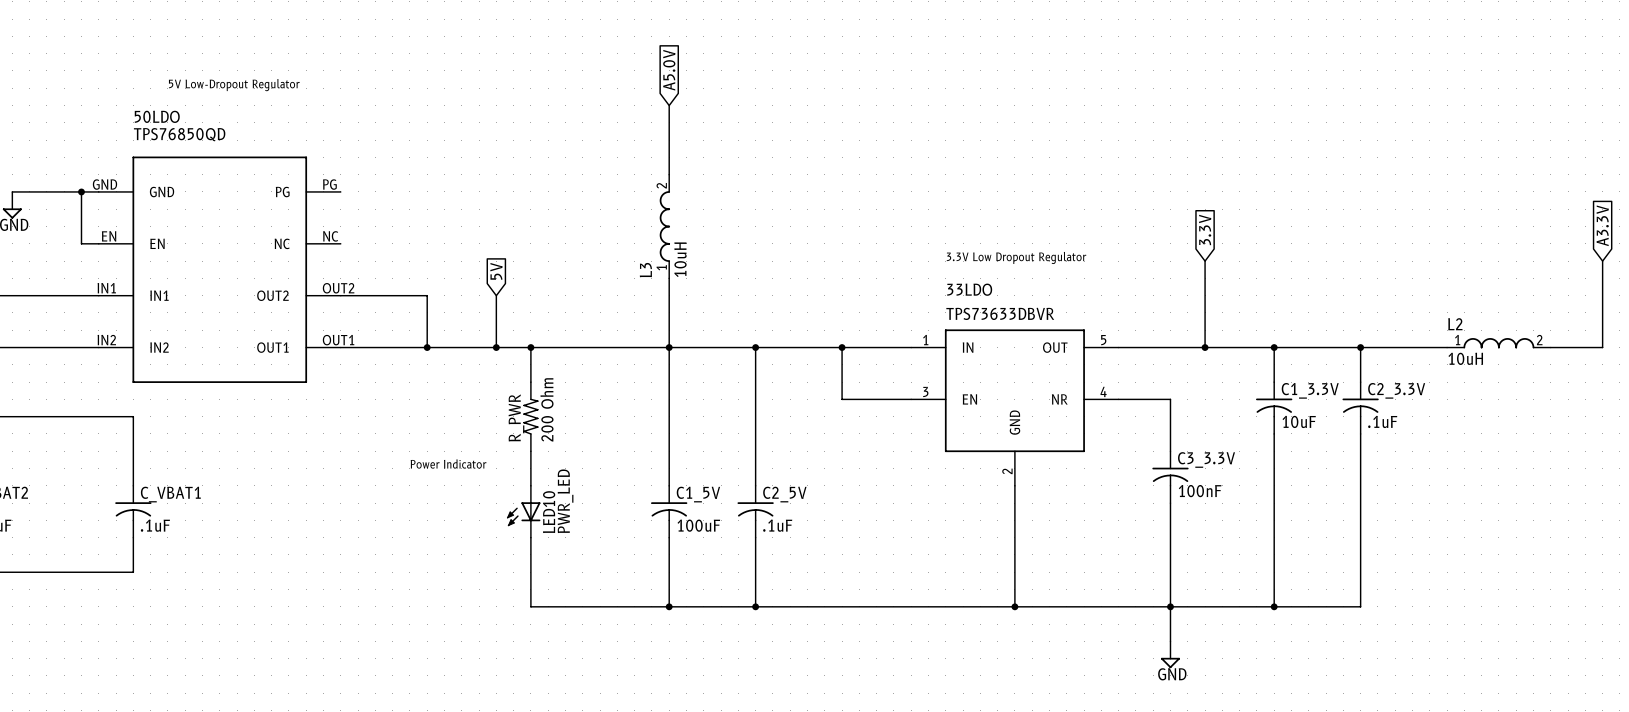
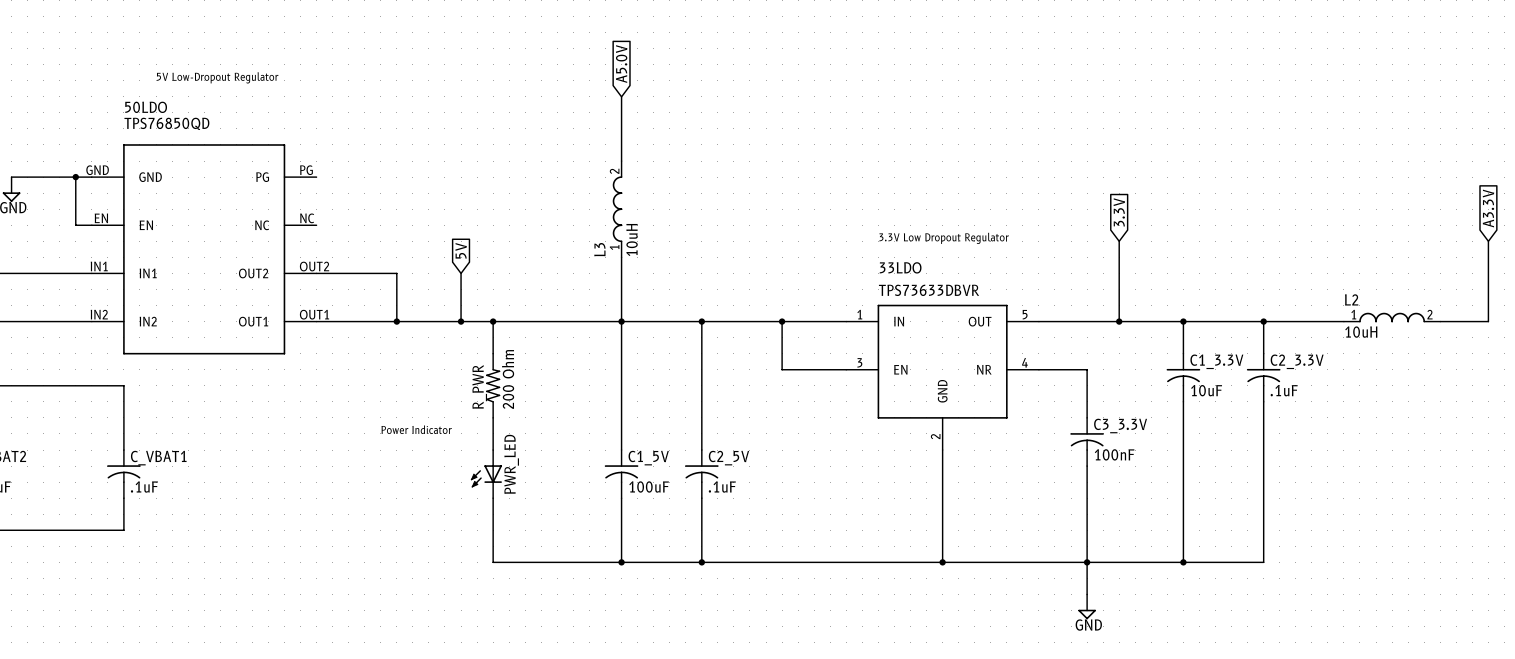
LED10 value: PWR_LED (565, 501) -> none
LED10 name: LED10 (549, 512) -> PWR_LED (511, 464)

